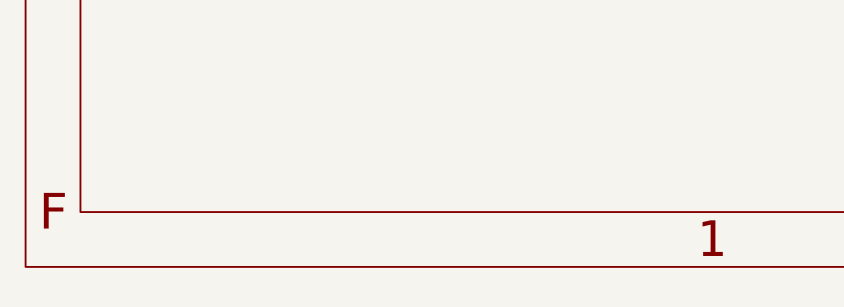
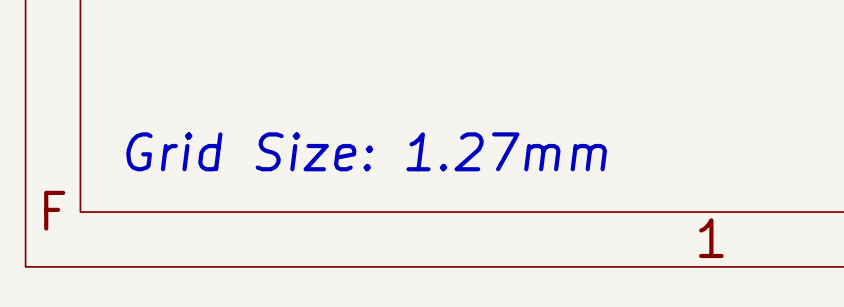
text: none -> Grid Size: 1.27mm (366, 151)

